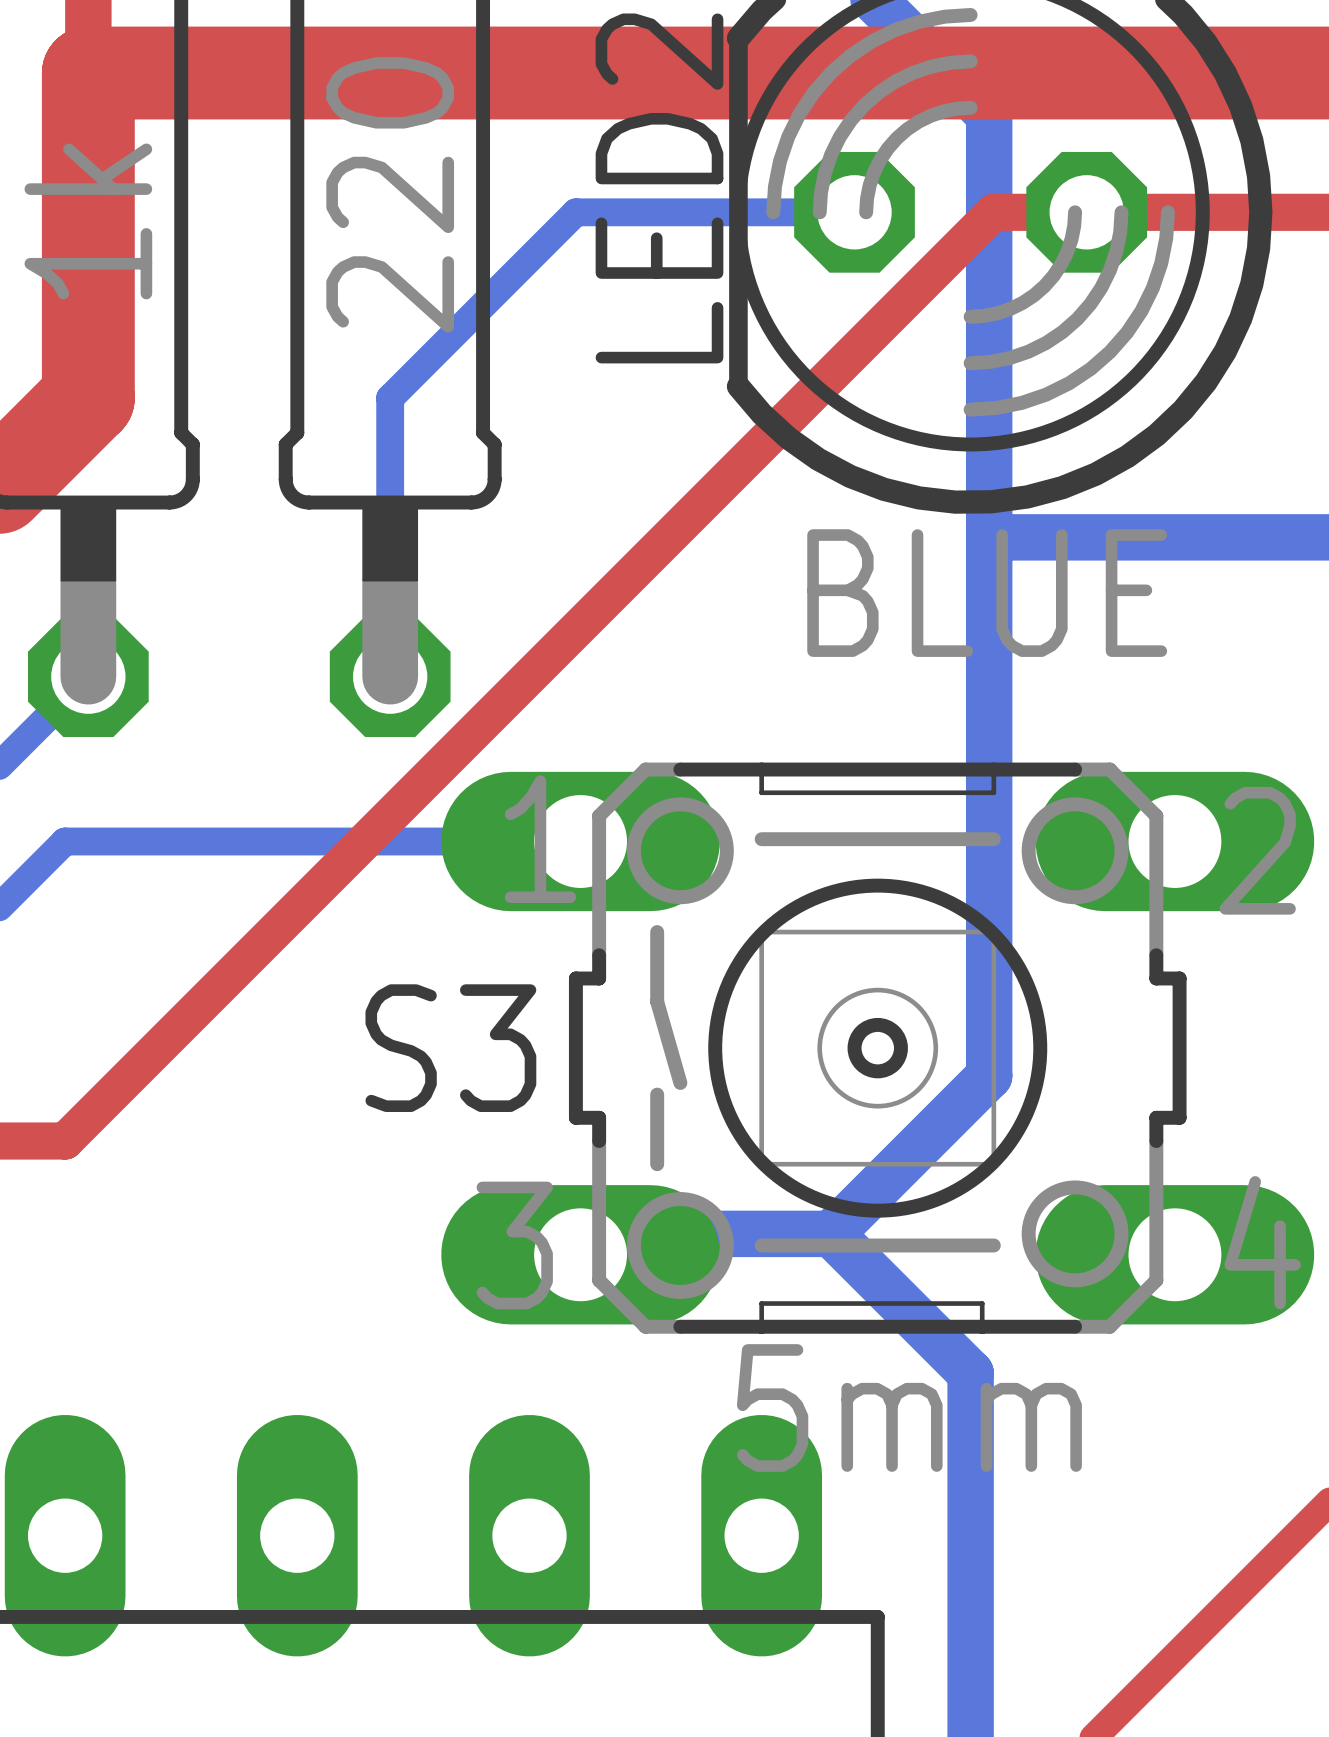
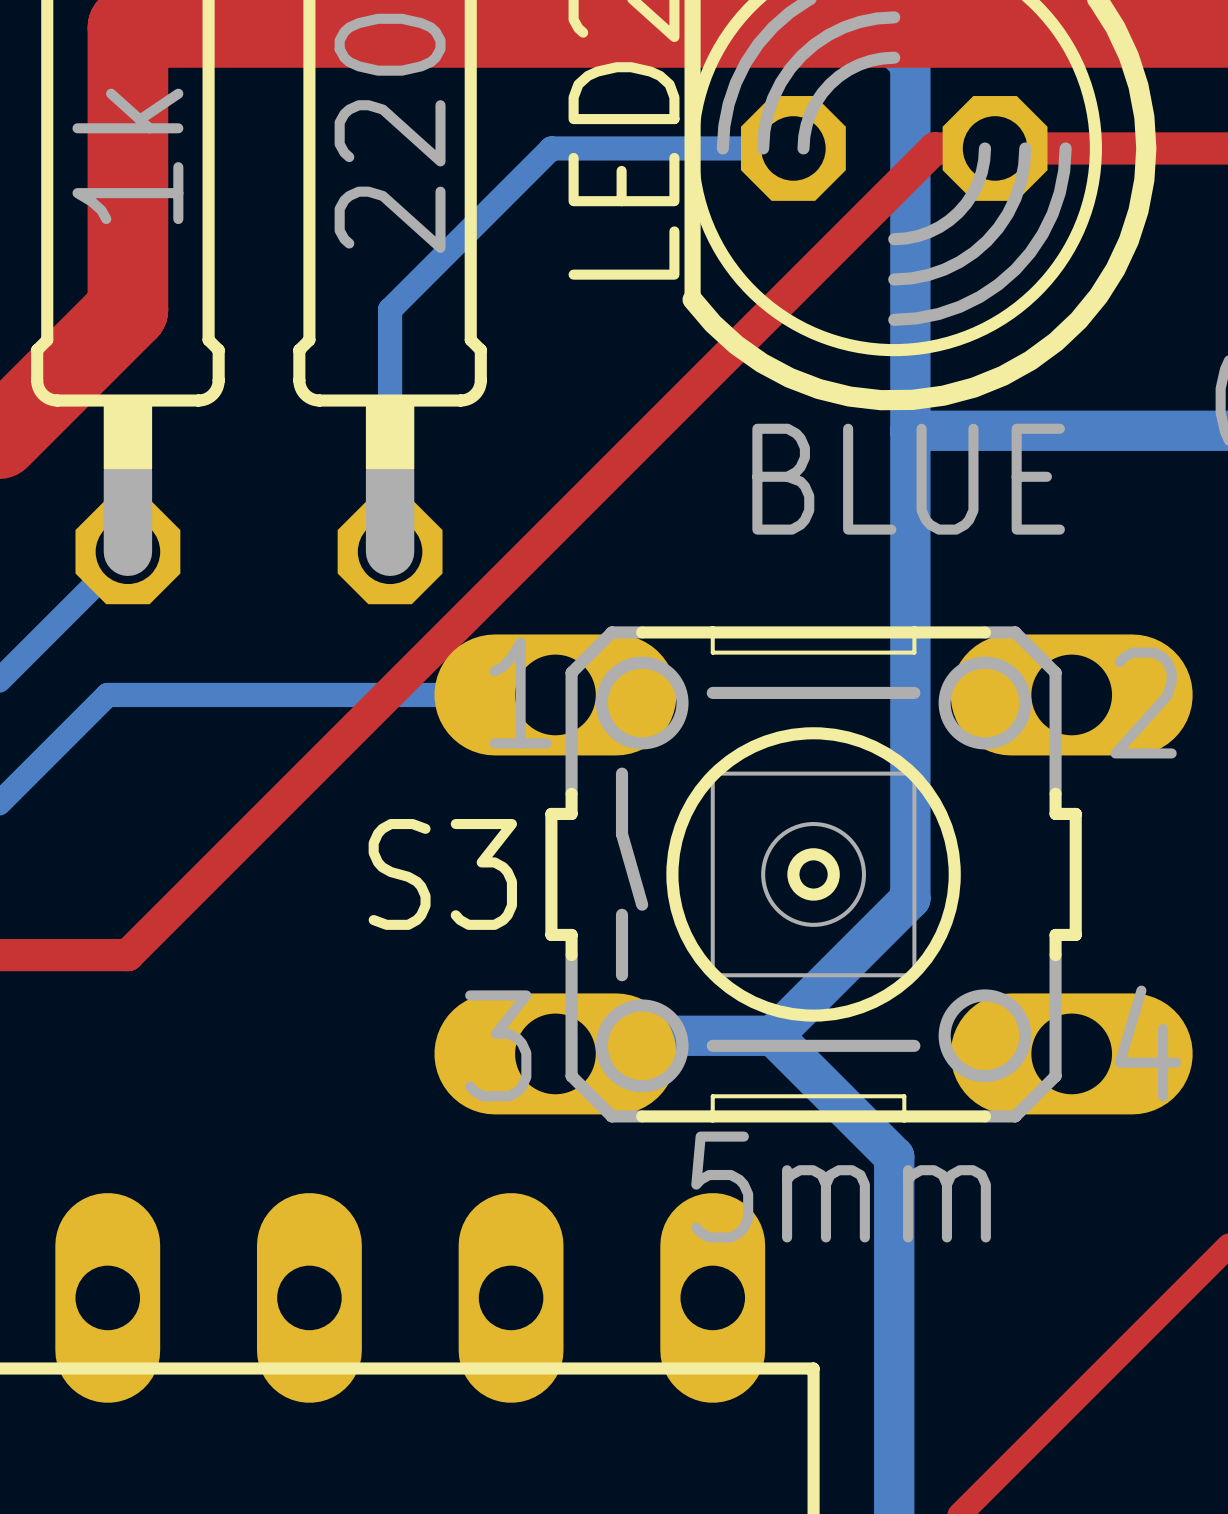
top track: (1017, 212) (993, 212) (65, 1141) -> (934, 148) (127, 955) (107, 955)

